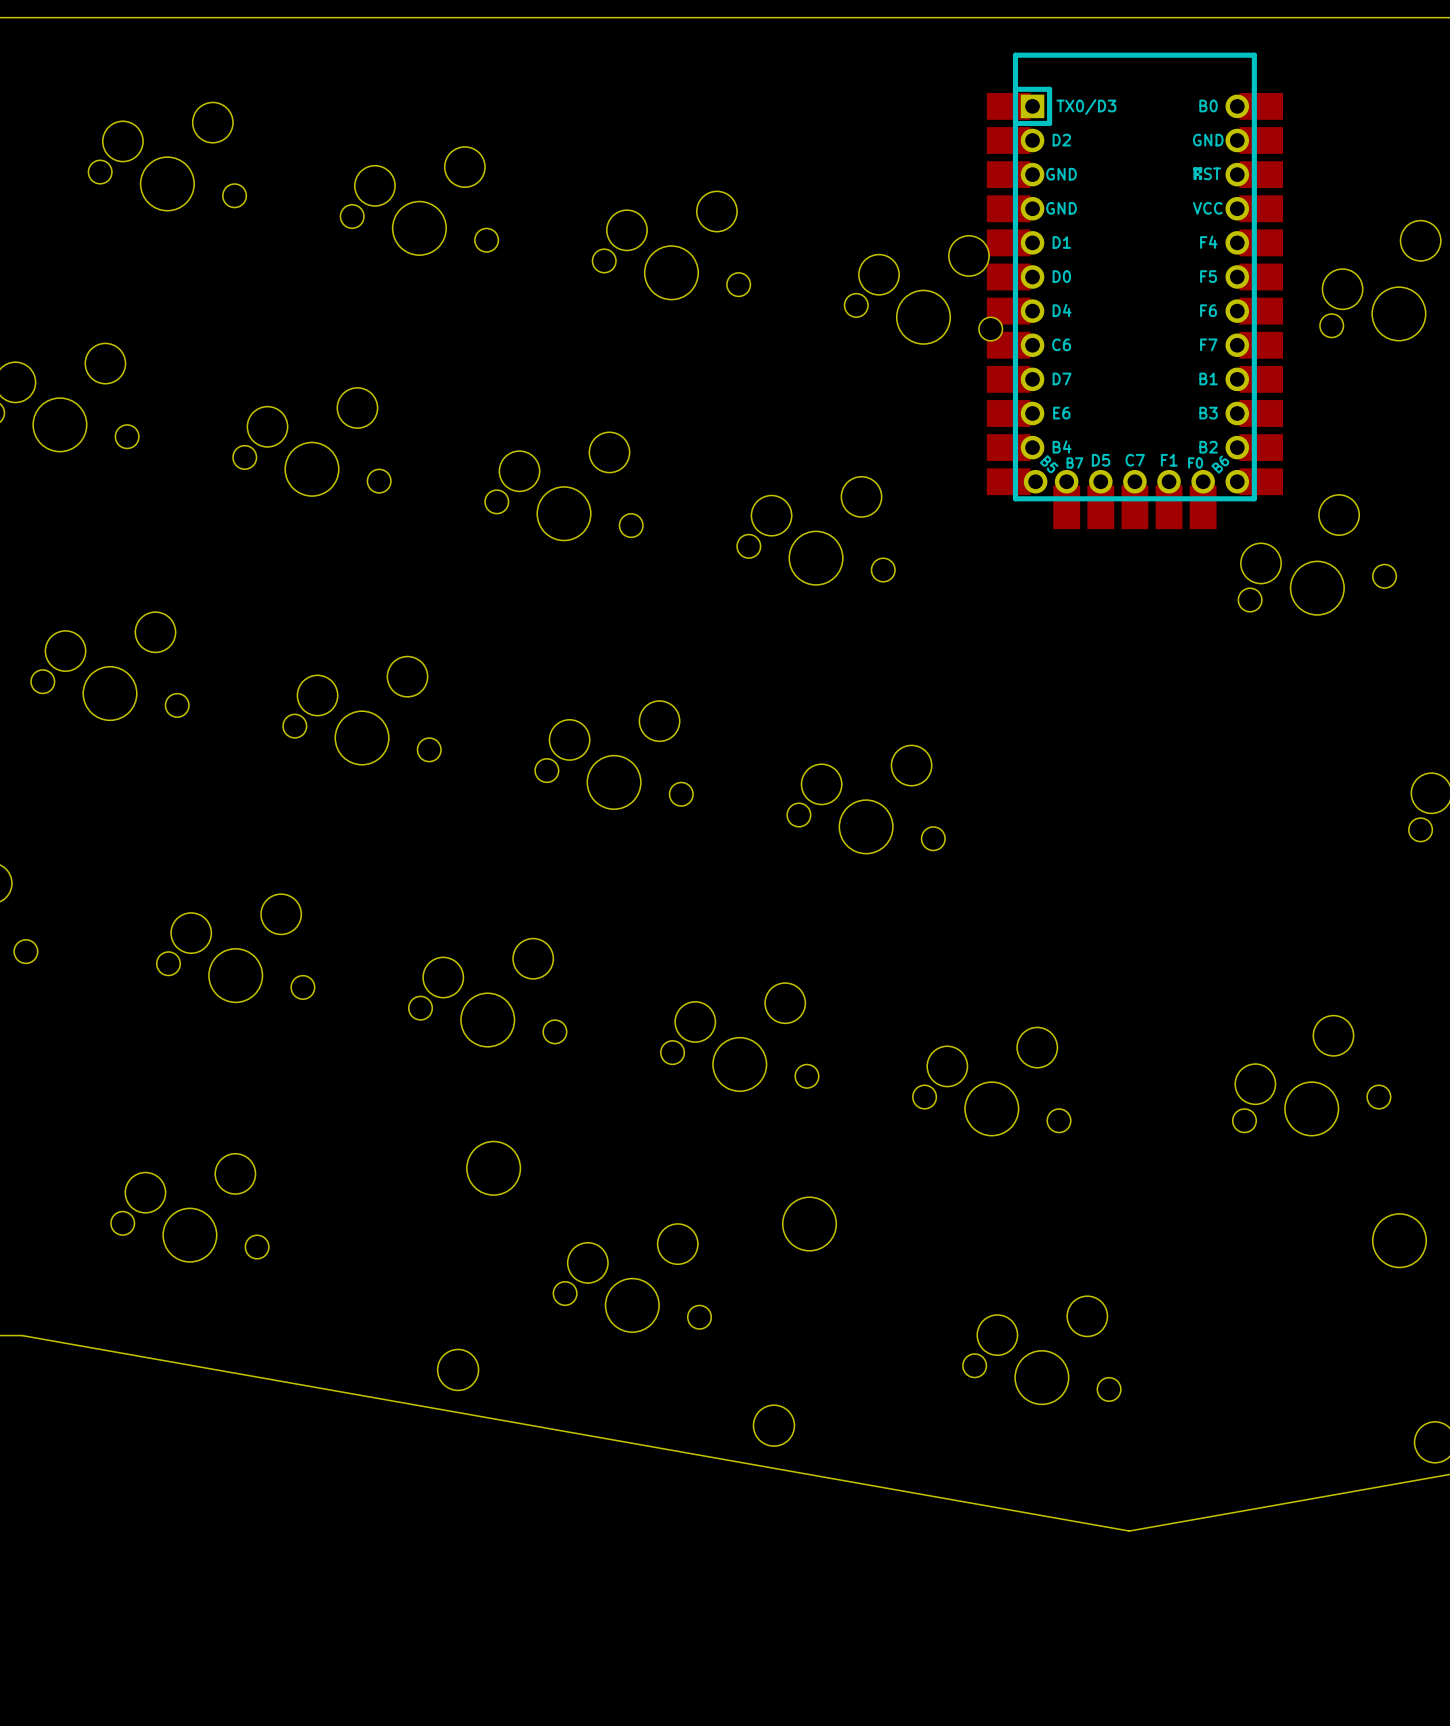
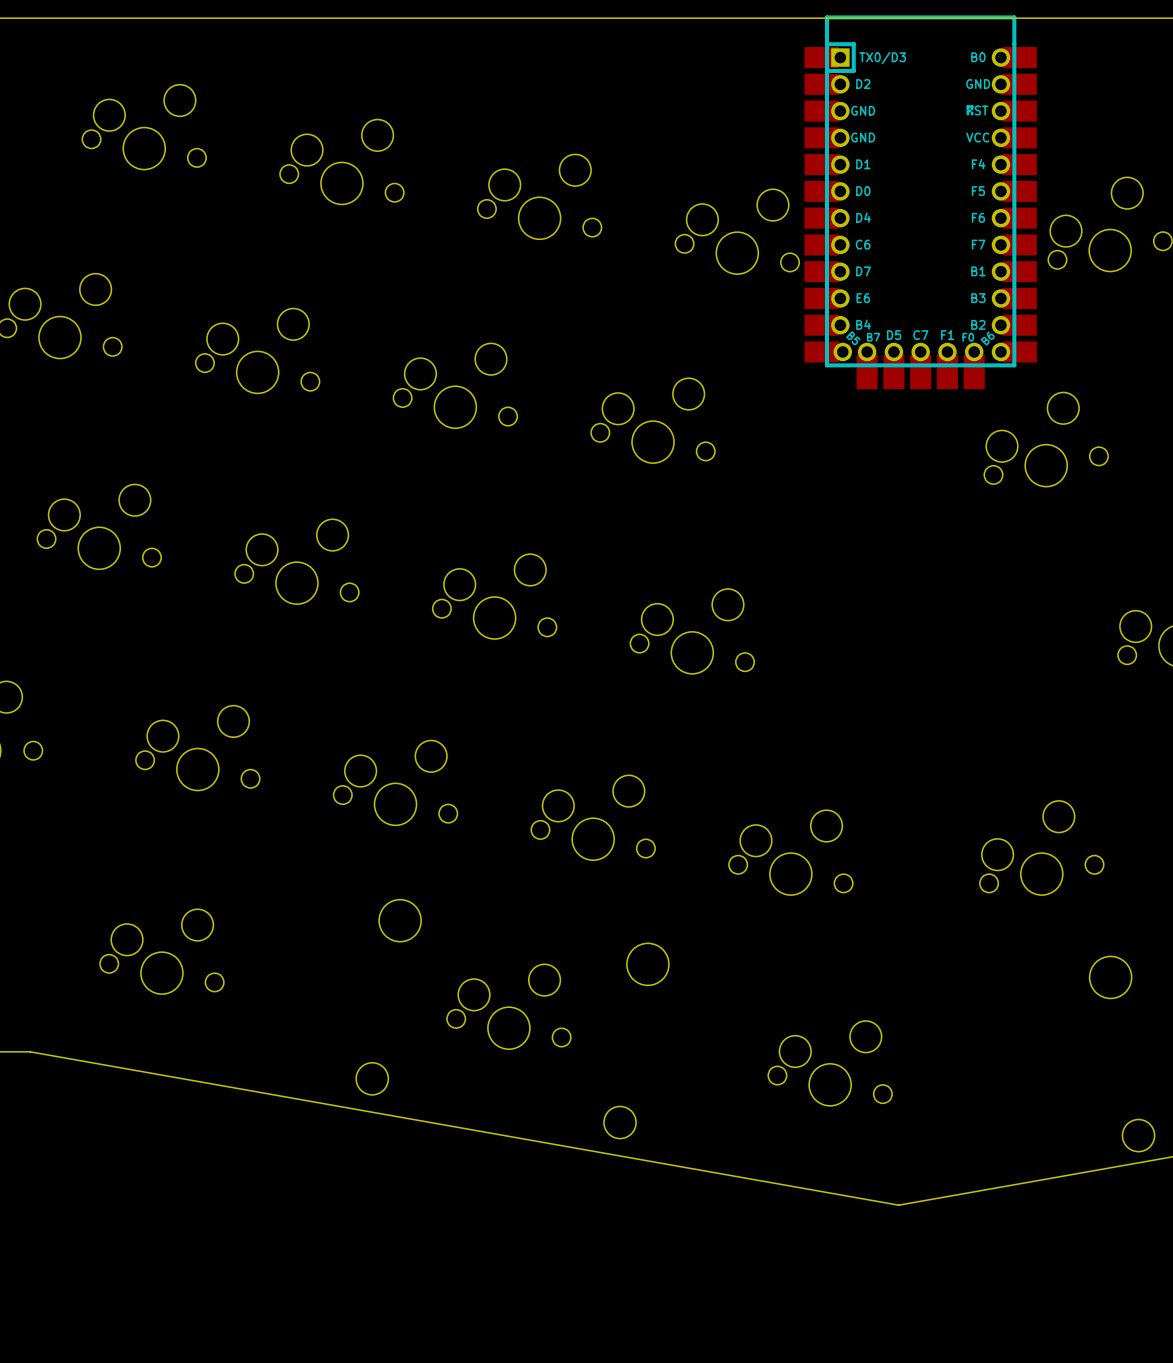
part position: (1134, 290) -> (920, 202)

